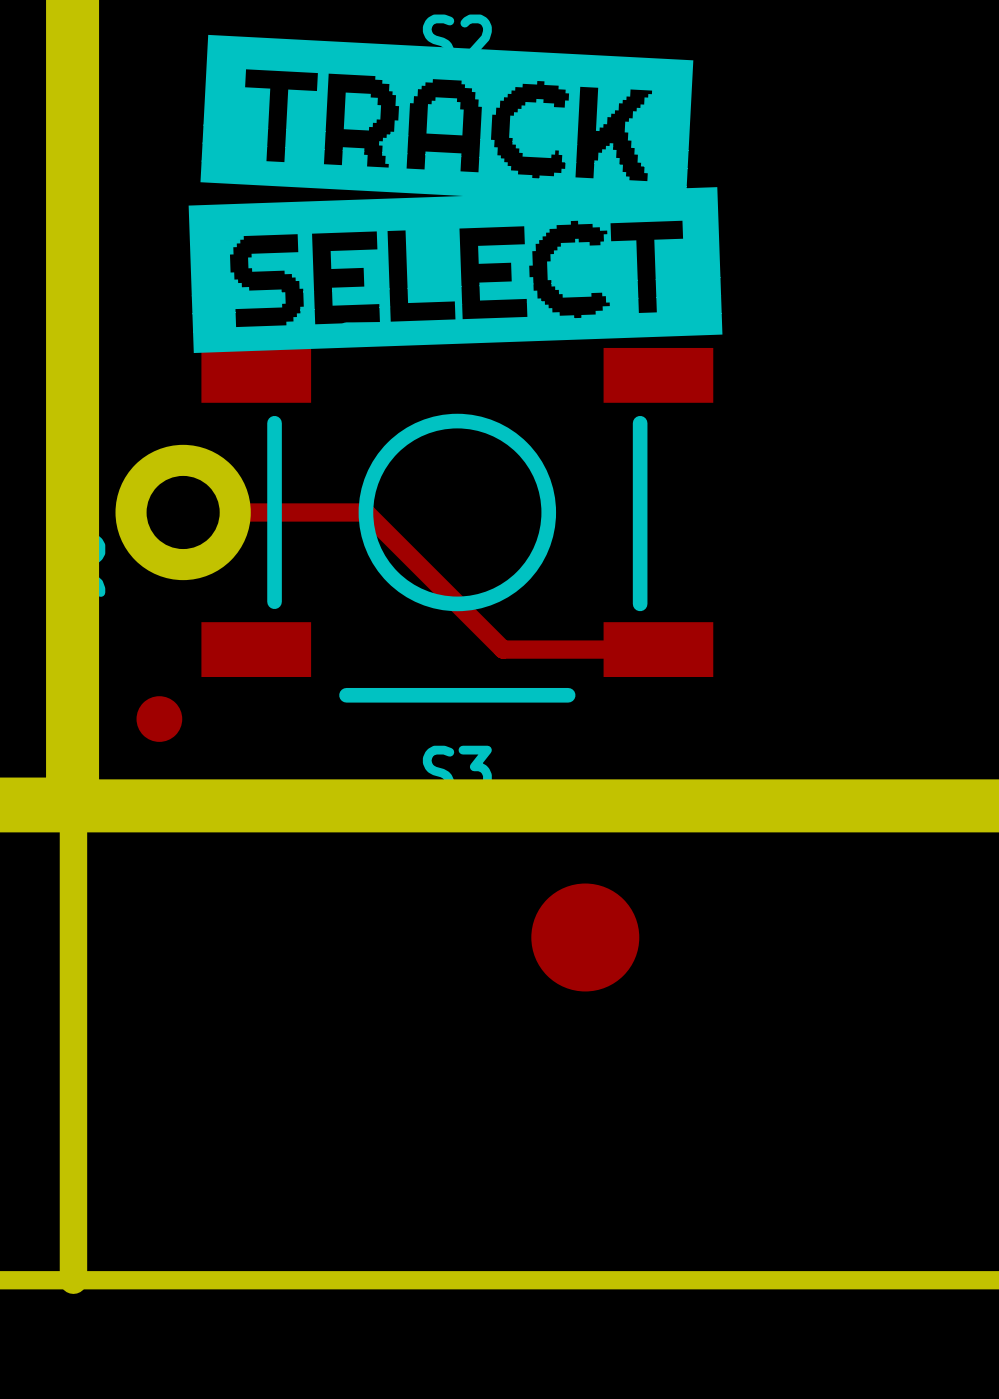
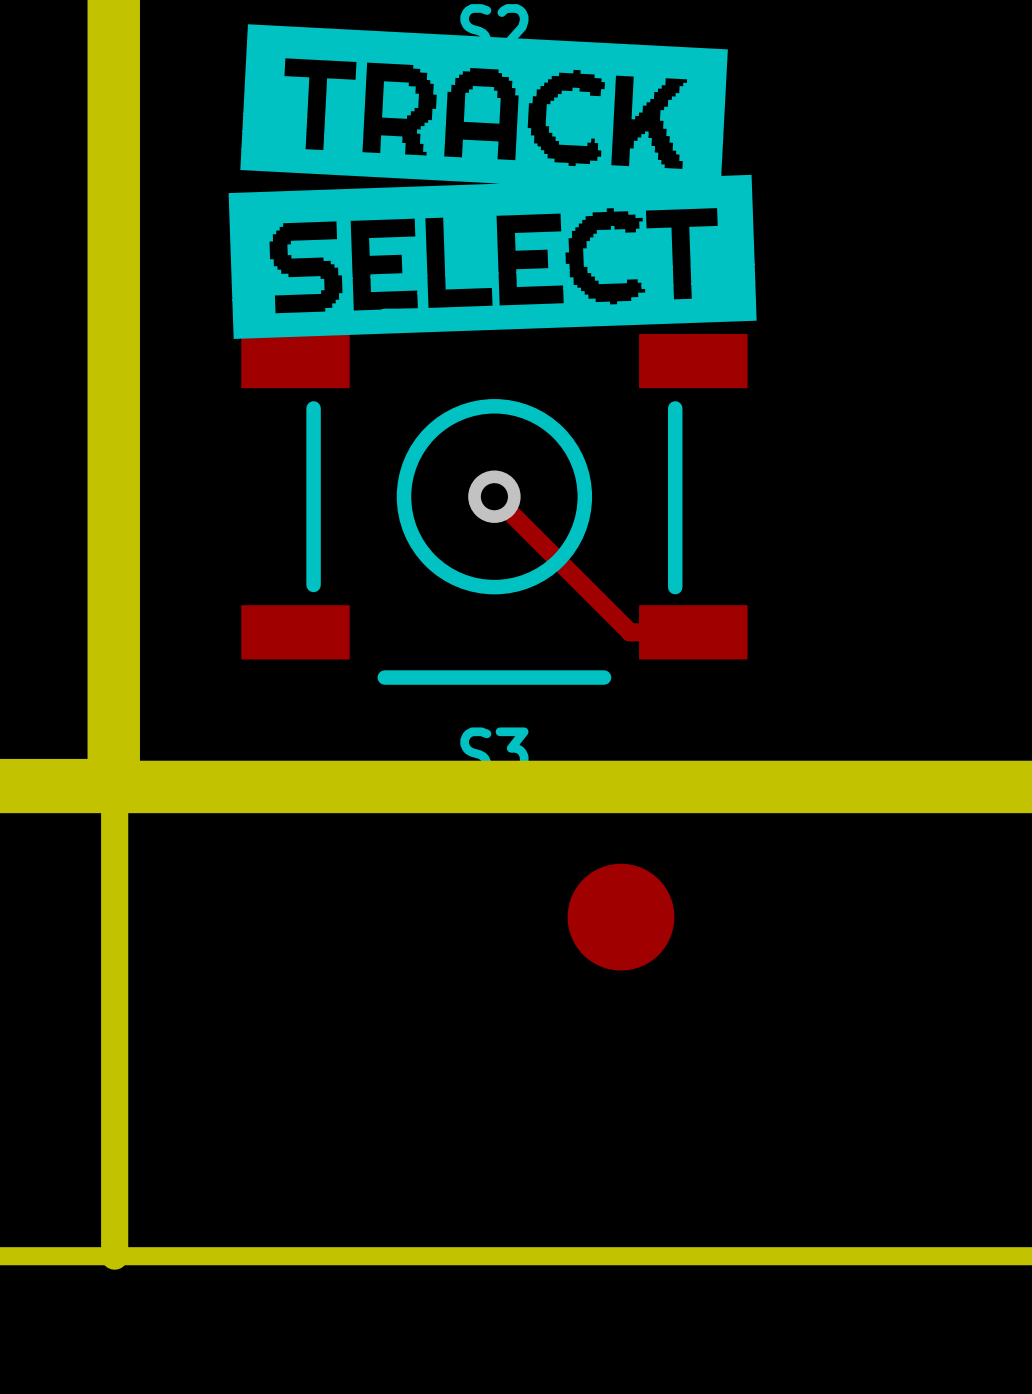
track: (183, 512) (365, 512) (503, 649) (594, 649) -> (494, 496) (630, 632)
part: (183, 512) -> none
via: none -> (494, 496)
part: (159, 719) -> none

